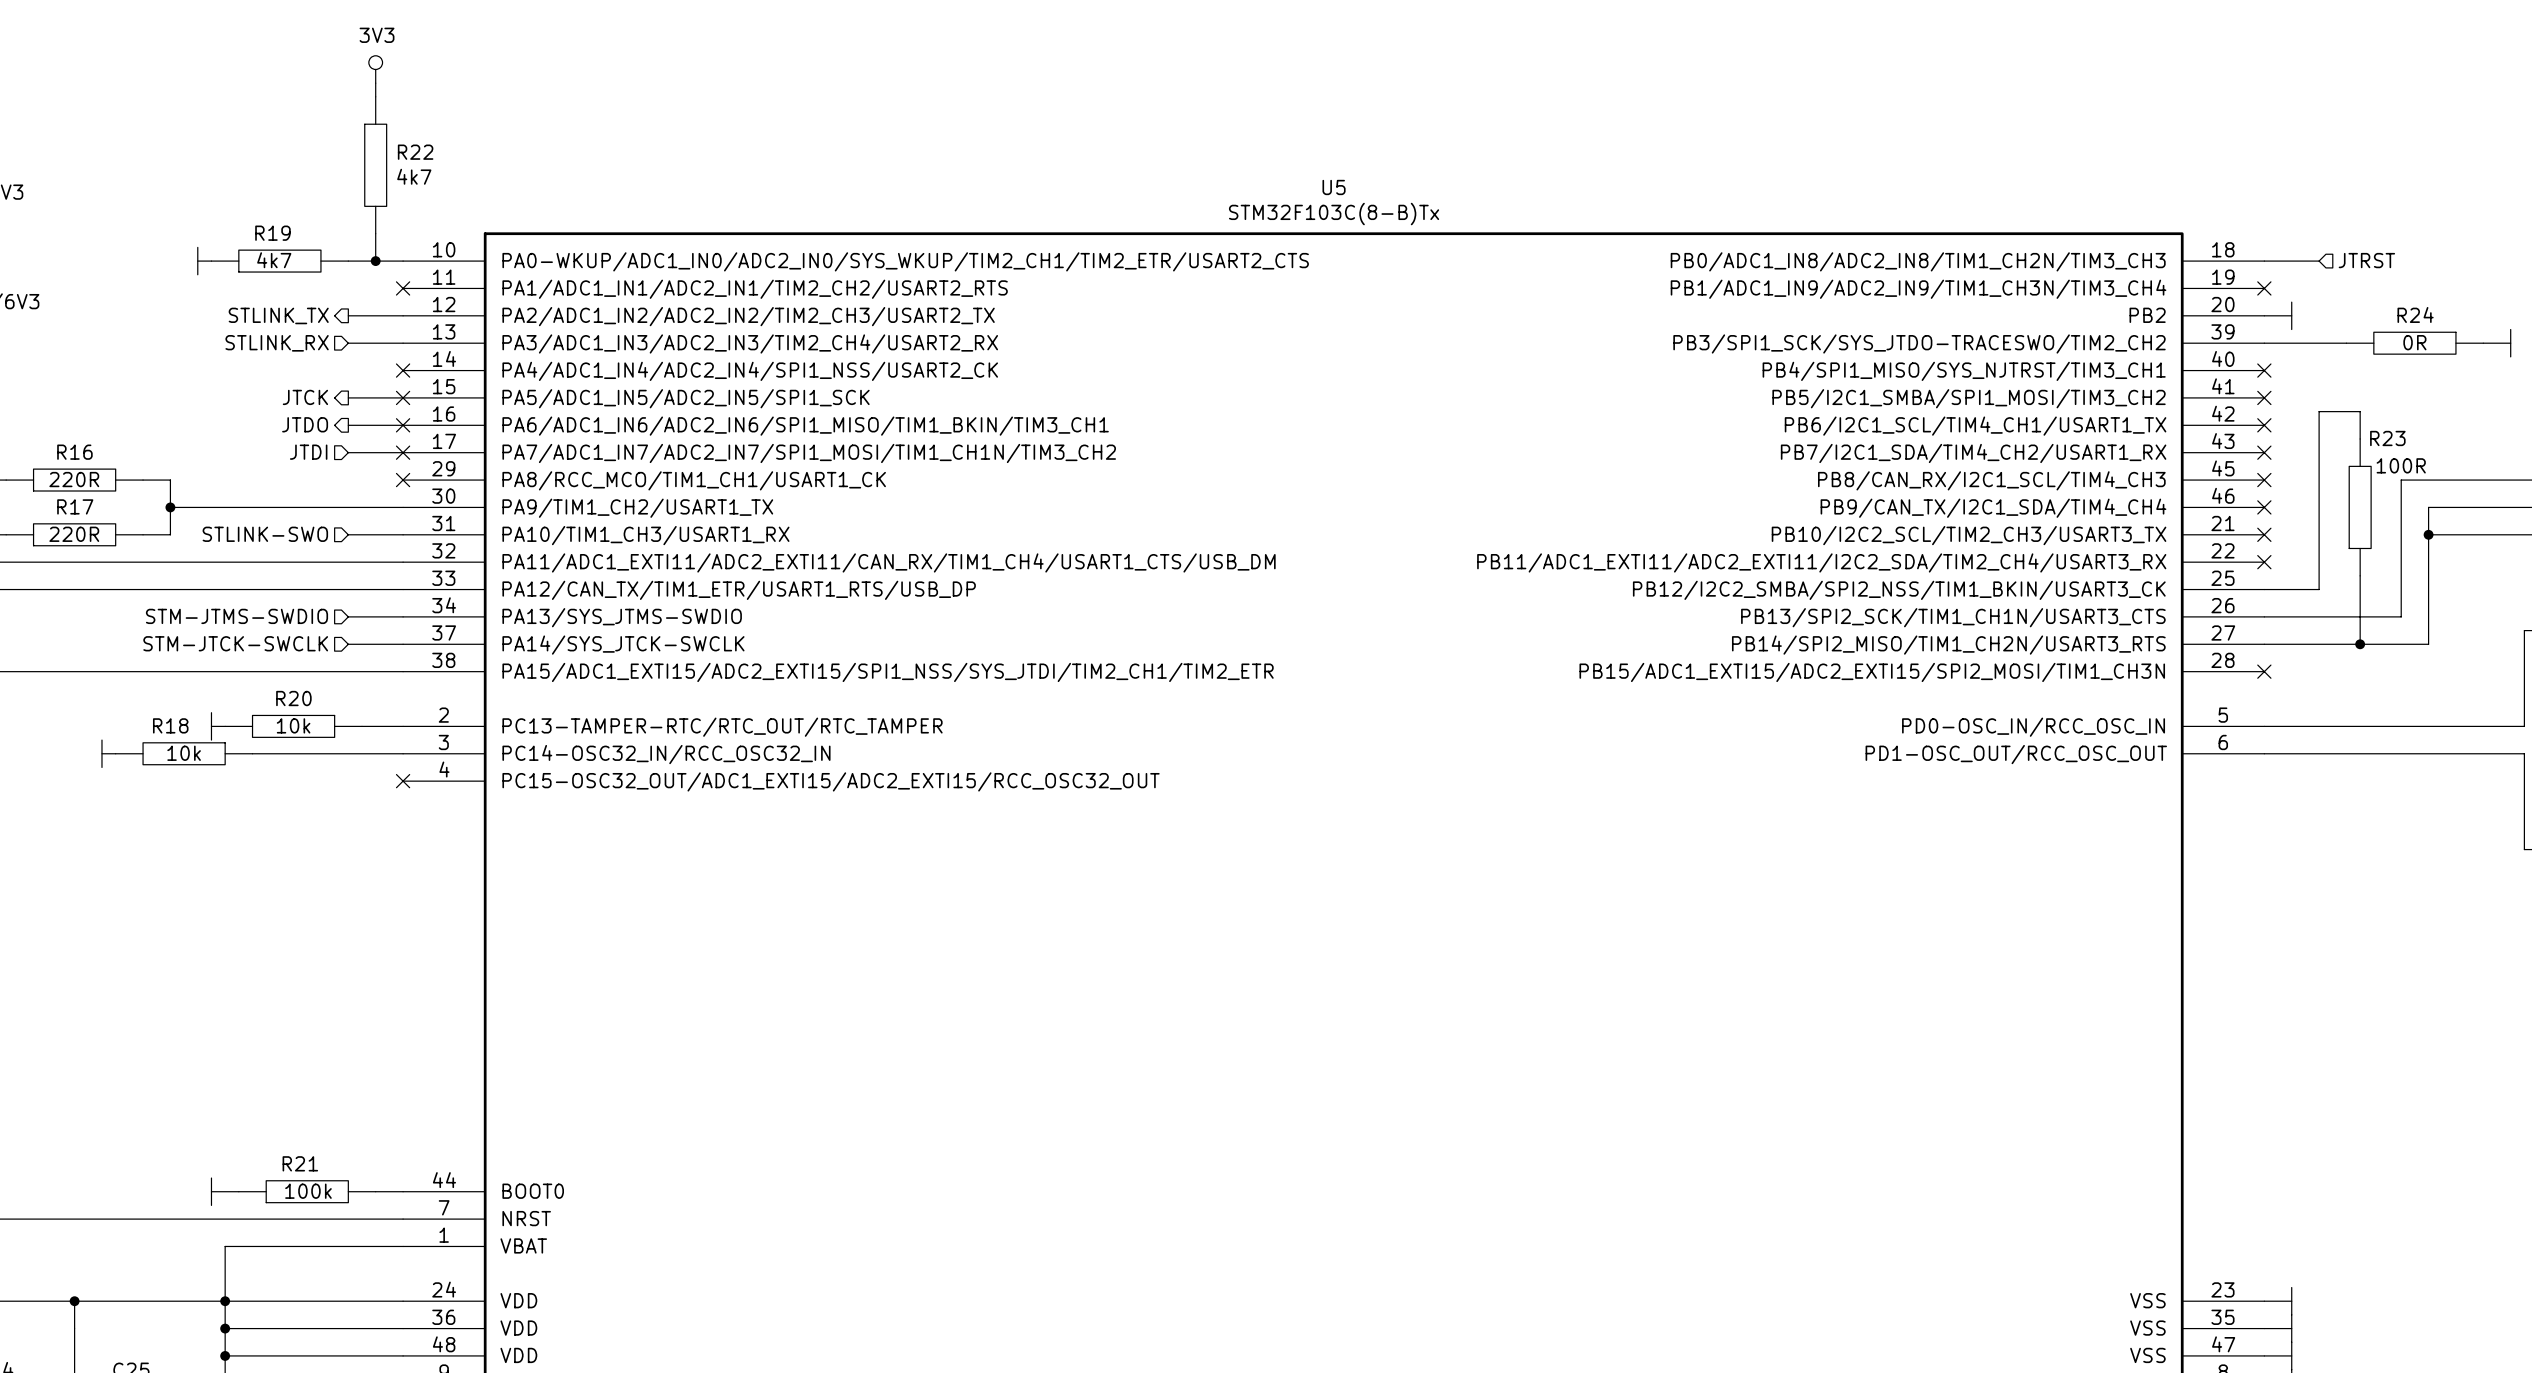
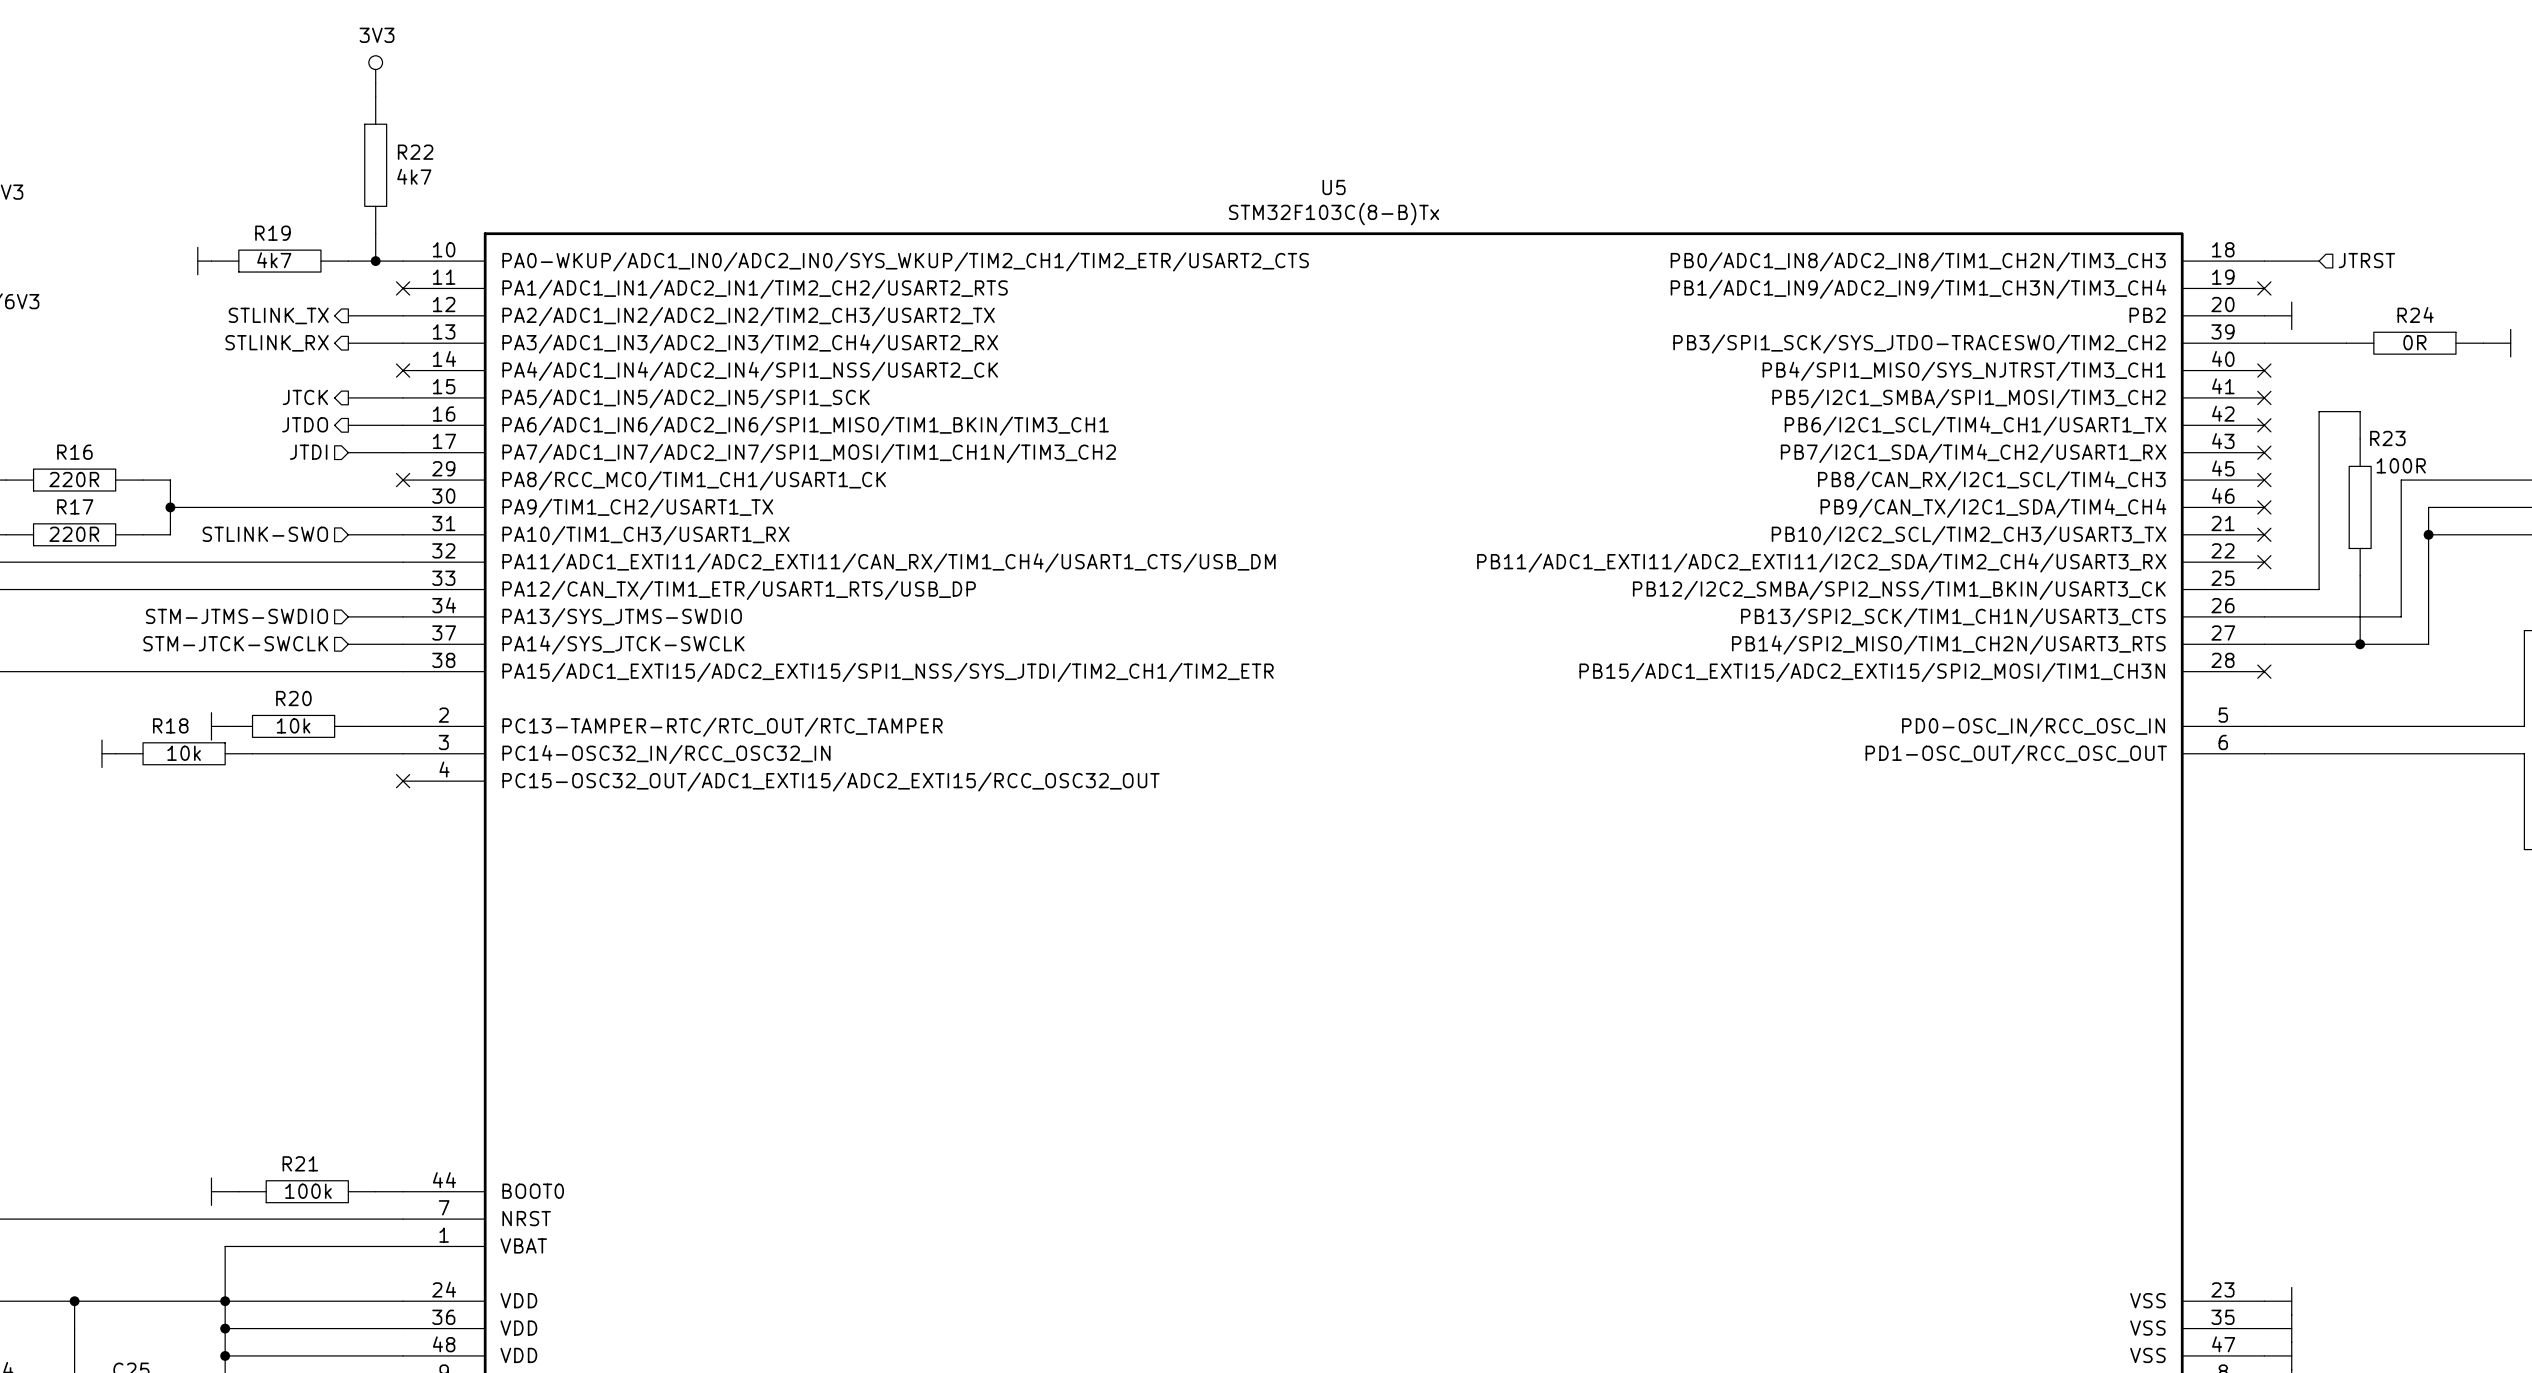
hierarchical label shape: input (277, 343) -> output (277, 343)
no-connect mark: (403, 397) -> none
no-connect mark: (403, 425) -> none
no-connect mark: (403, 452) -> none

